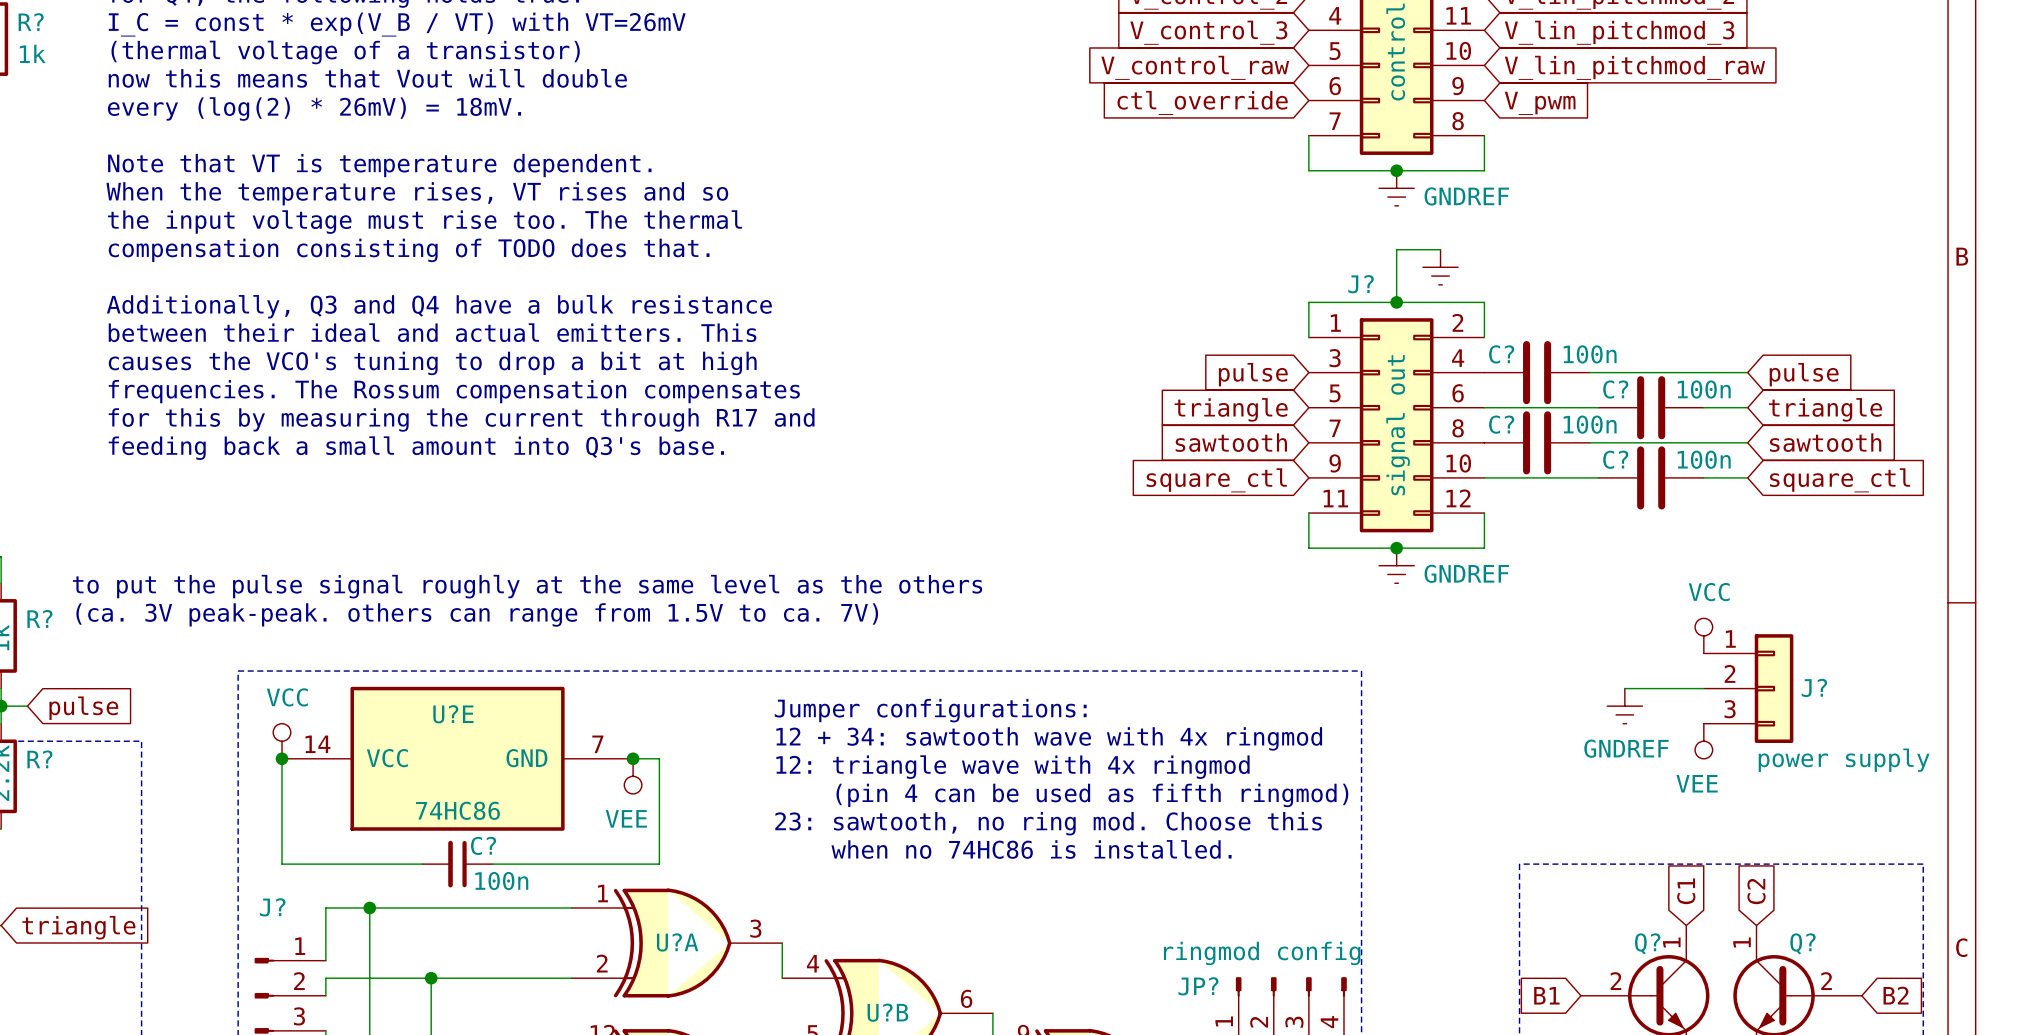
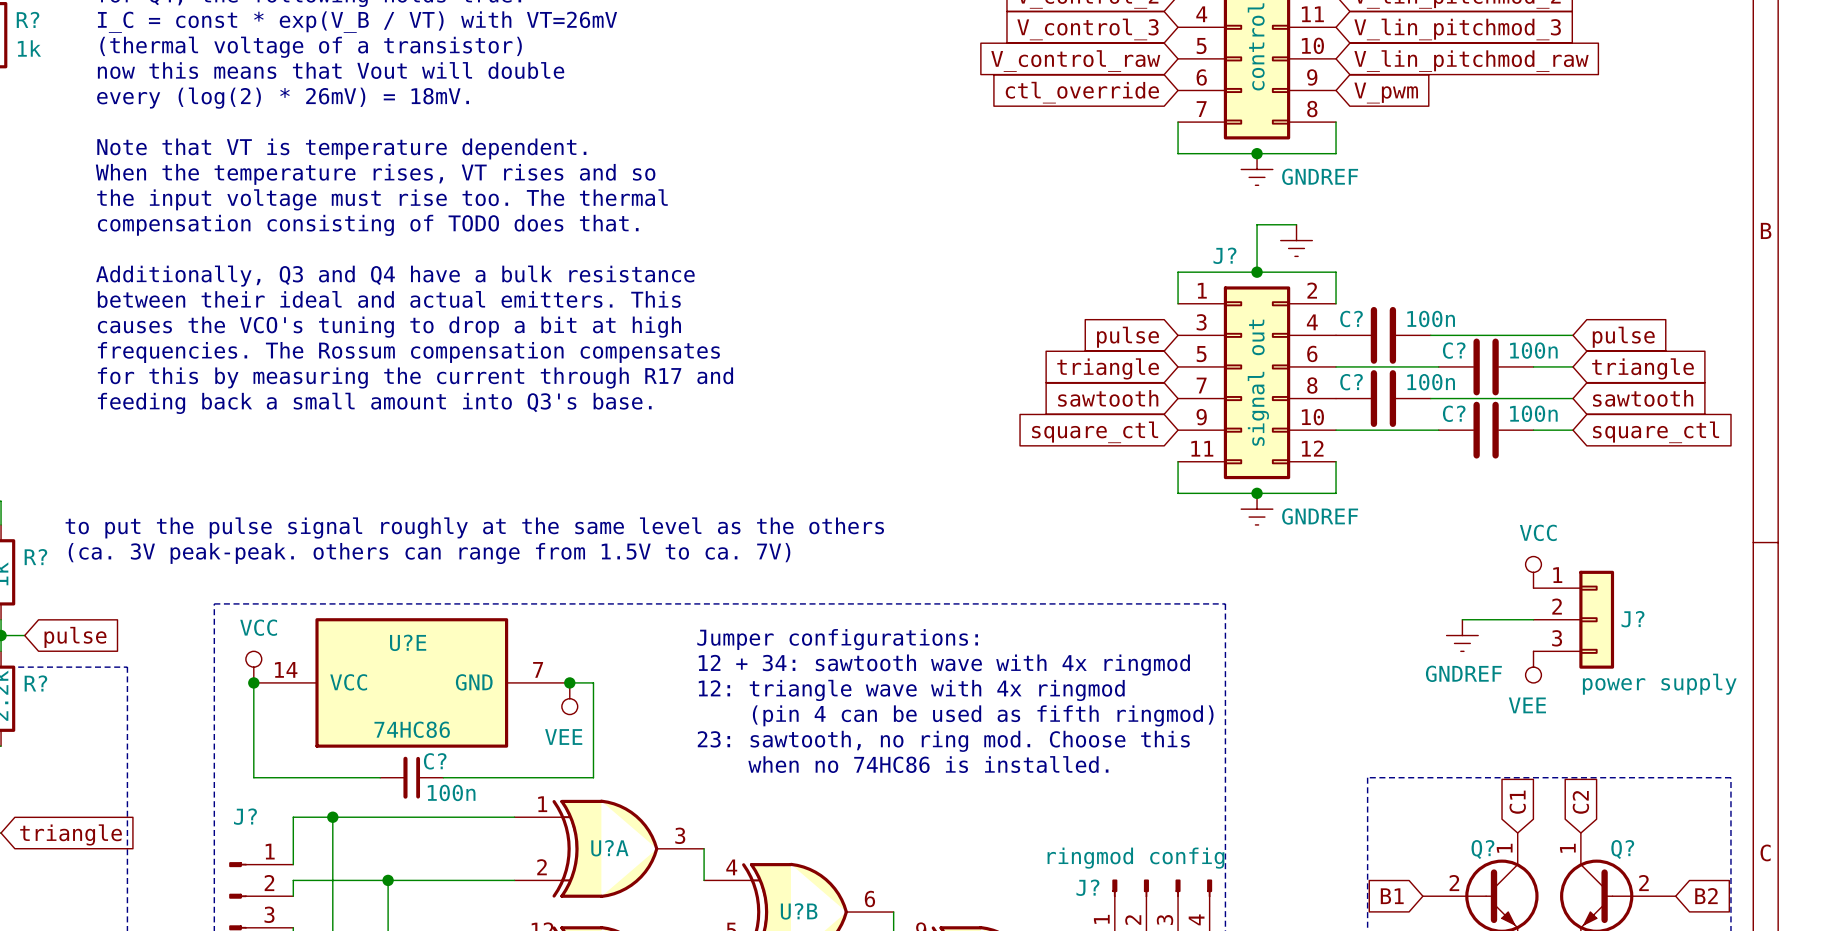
JP? name: JP? (1198, 986) -> J? (1087, 887)

